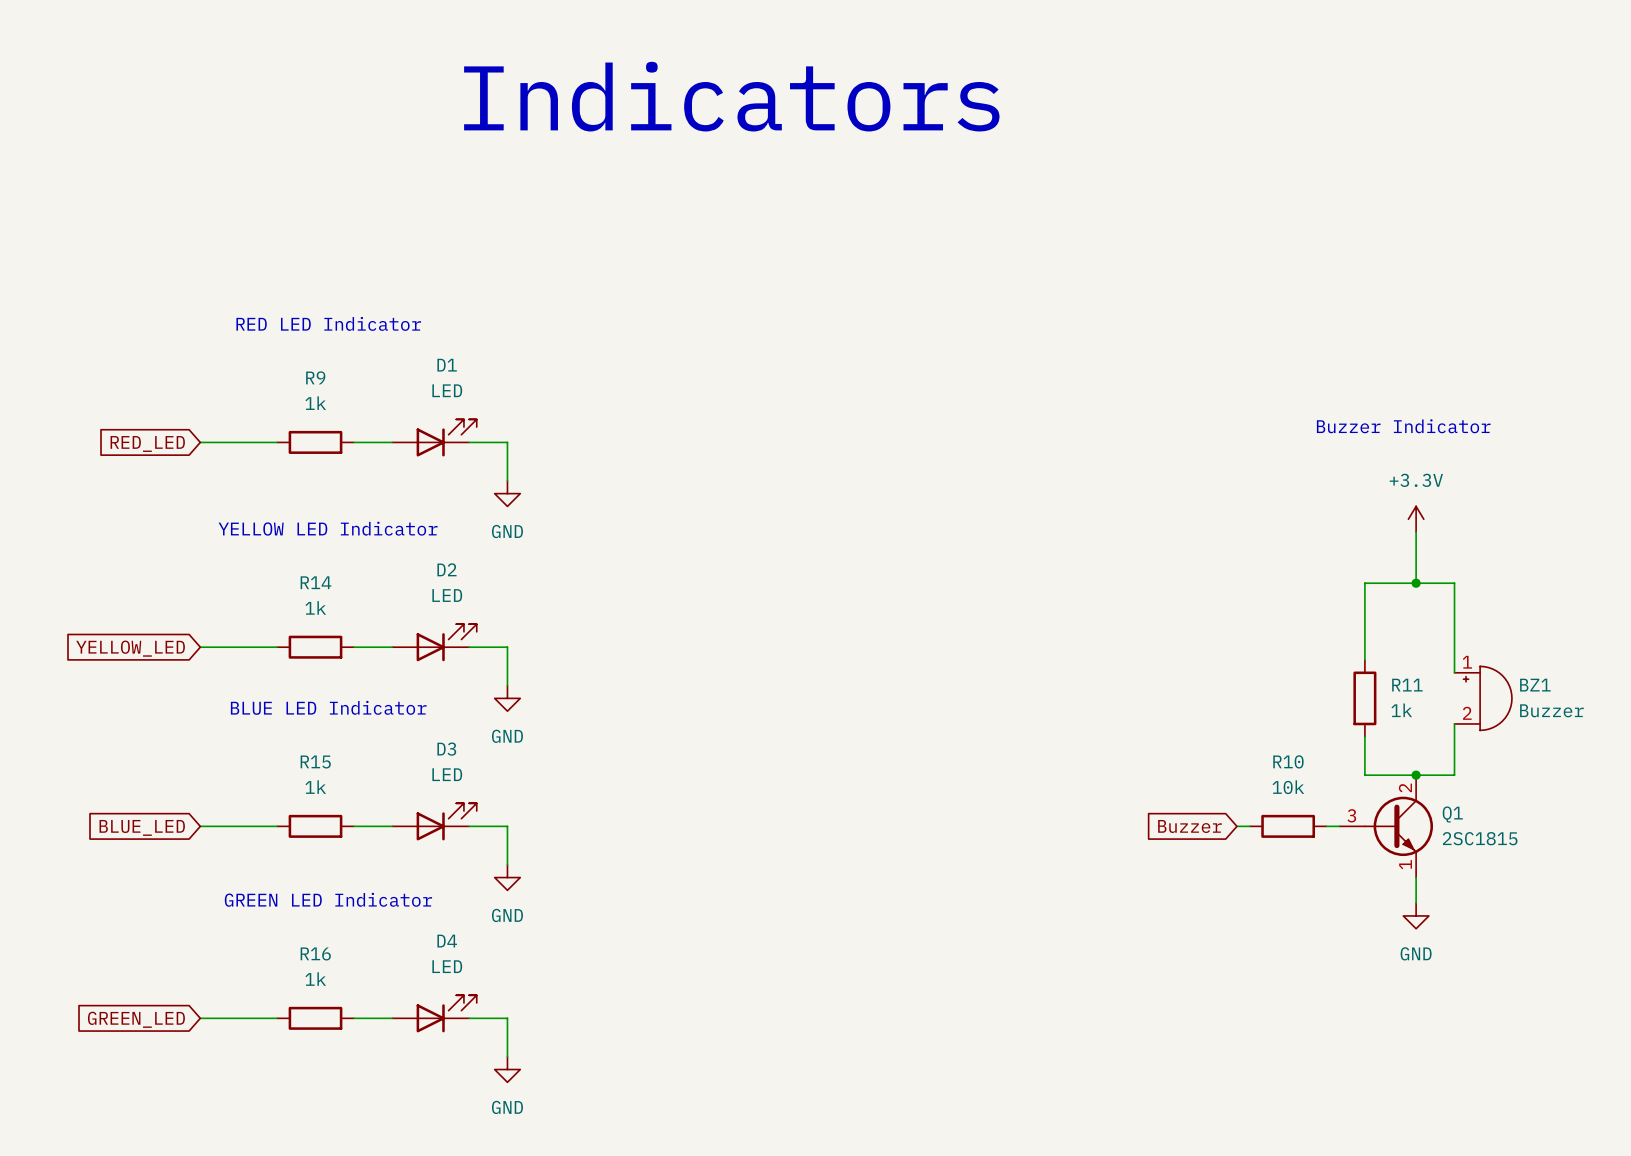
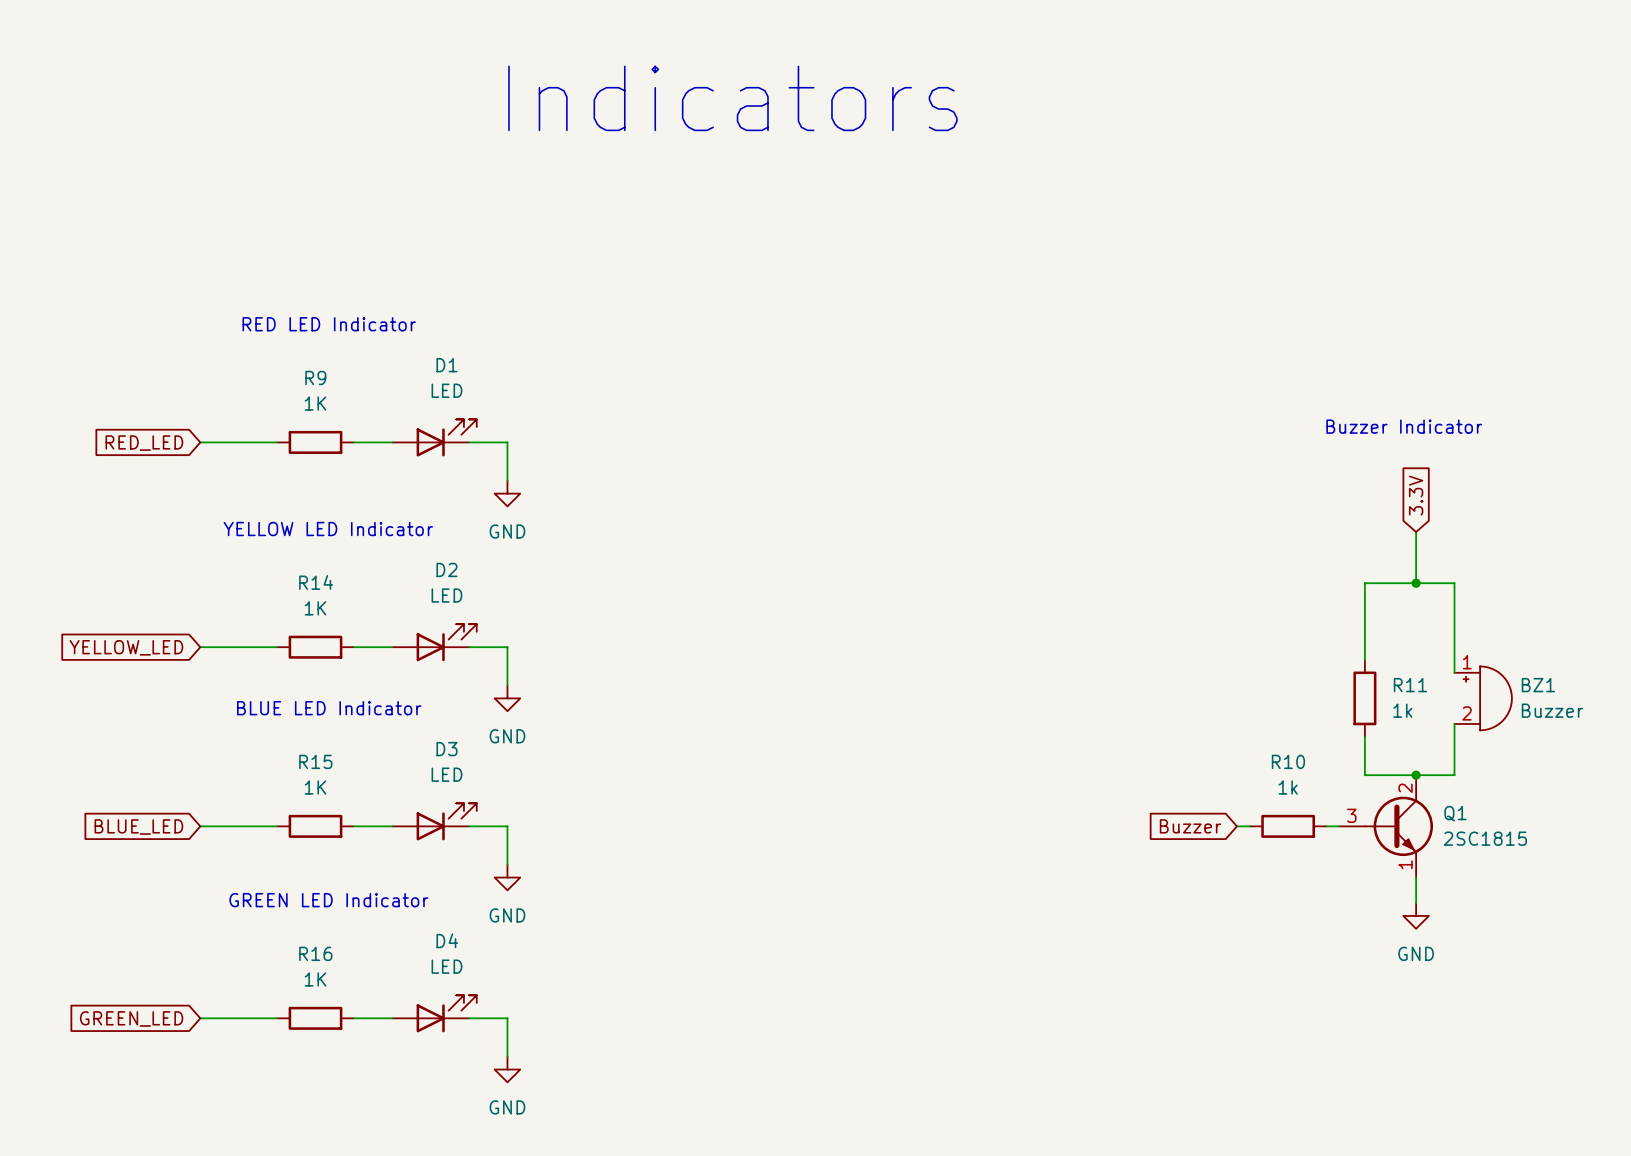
R9 value: 1k (315, 403) -> 1K (315, 403)
global label: none -> 3.3V (1416, 495)
power symbol: +3.3V (1416, 519) -> none
R14 value: 1k (315, 607) -> 1K (315, 608)
R15 value: 1k (315, 787) -> 1K (315, 787)
R10 value: 10k (1288, 787) -> 1k (1288, 787)
R16 value: 1k (315, 979) -> 1K (315, 979)

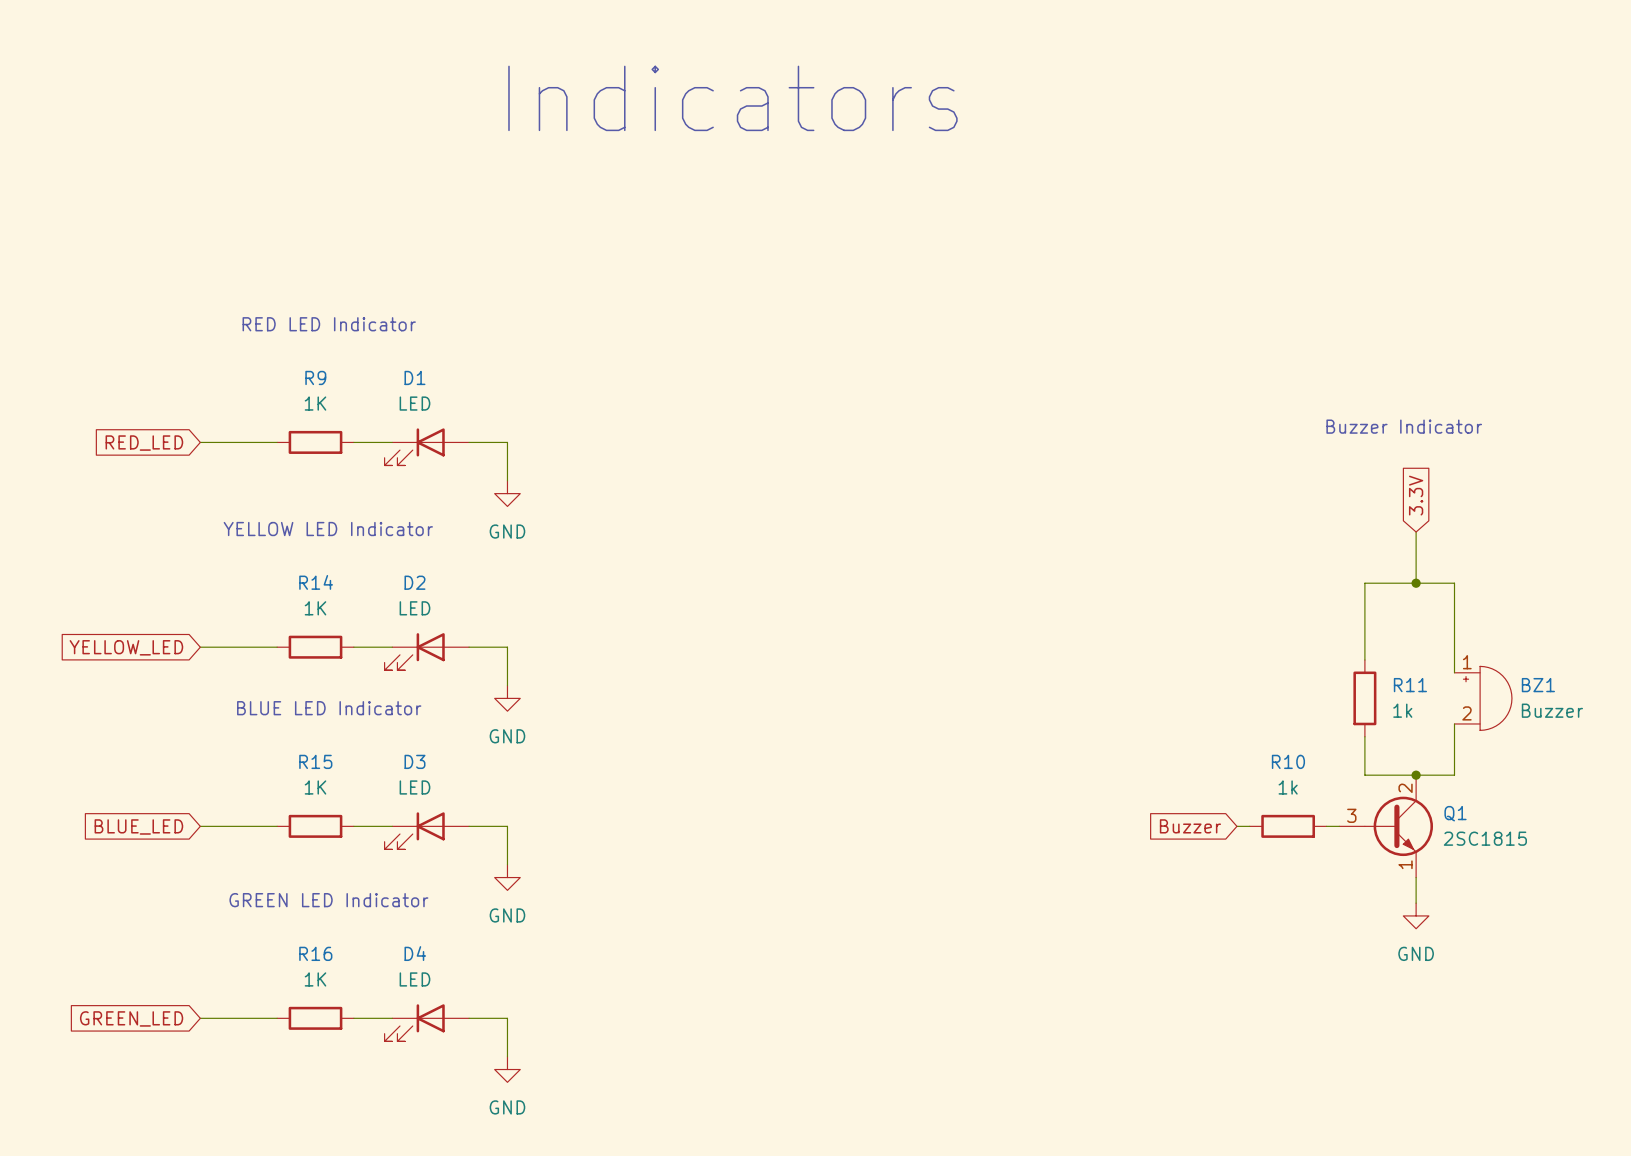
D1 name position: D1 (446, 365) -> D1 (414, 377)
D1 value position: LED (446, 390) -> LED (414, 403)
D1 rotation: 0° (446, 437) -> 180° (414, 446)
D2 name position: D2 (446, 569) -> D2 (414, 582)
D2 value position: LED (446, 595) -> LED (414, 608)
D2 rotation: 0° (446, 642) -> 180° (414, 651)
D3 name position: D3 (446, 749) -> D3 (414, 761)
D3 value position: LED (446, 774) -> LED (414, 787)
D3 rotation: 0° (446, 821) -> 180° (414, 830)
D4 name position: D4 (447, 940) -> D4 (415, 953)
D4 value position: LED (446, 966) -> LED (414, 979)
D4 rotation: 0° (446, 1013) -> 180° (414, 1022)

